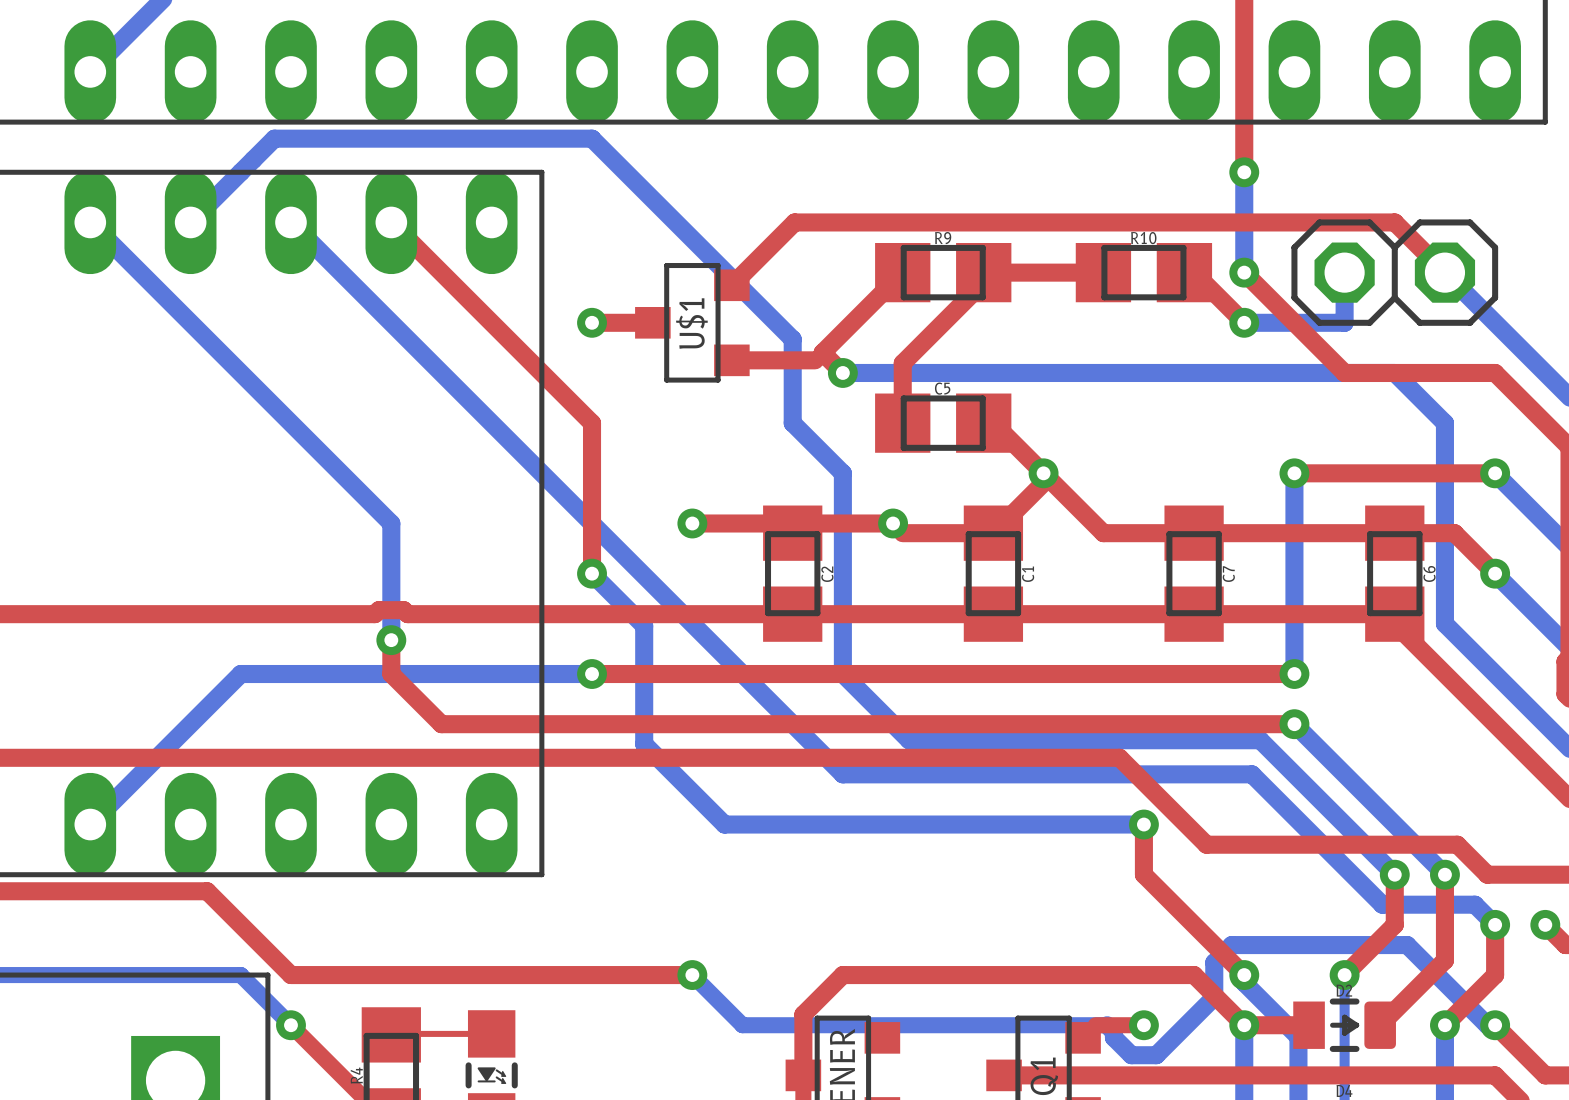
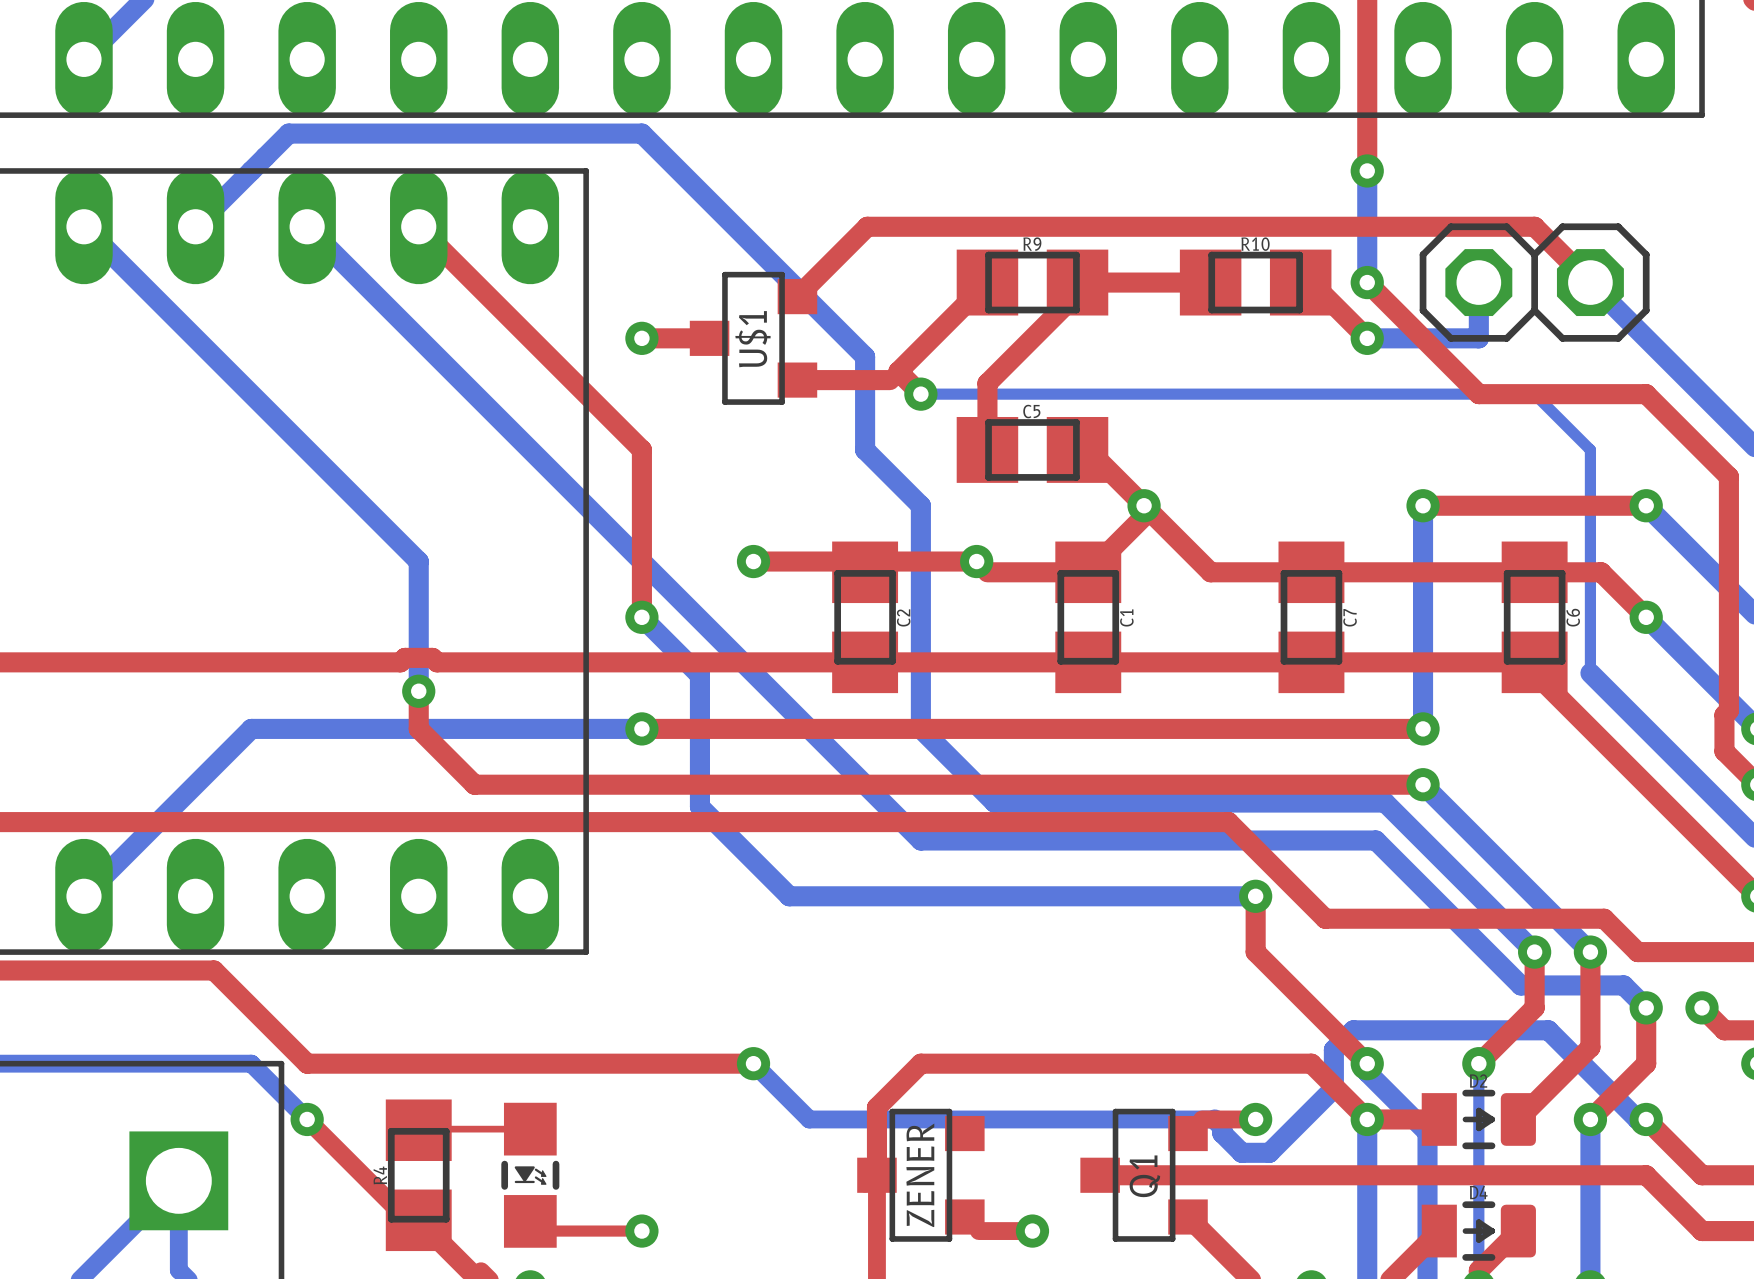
bottom track width: thick (842, 372) (1394, 372) (1444, 423) (1444, 623) -> thin (920, 394) (1534, 394) (1590, 449) (1590, 673)

